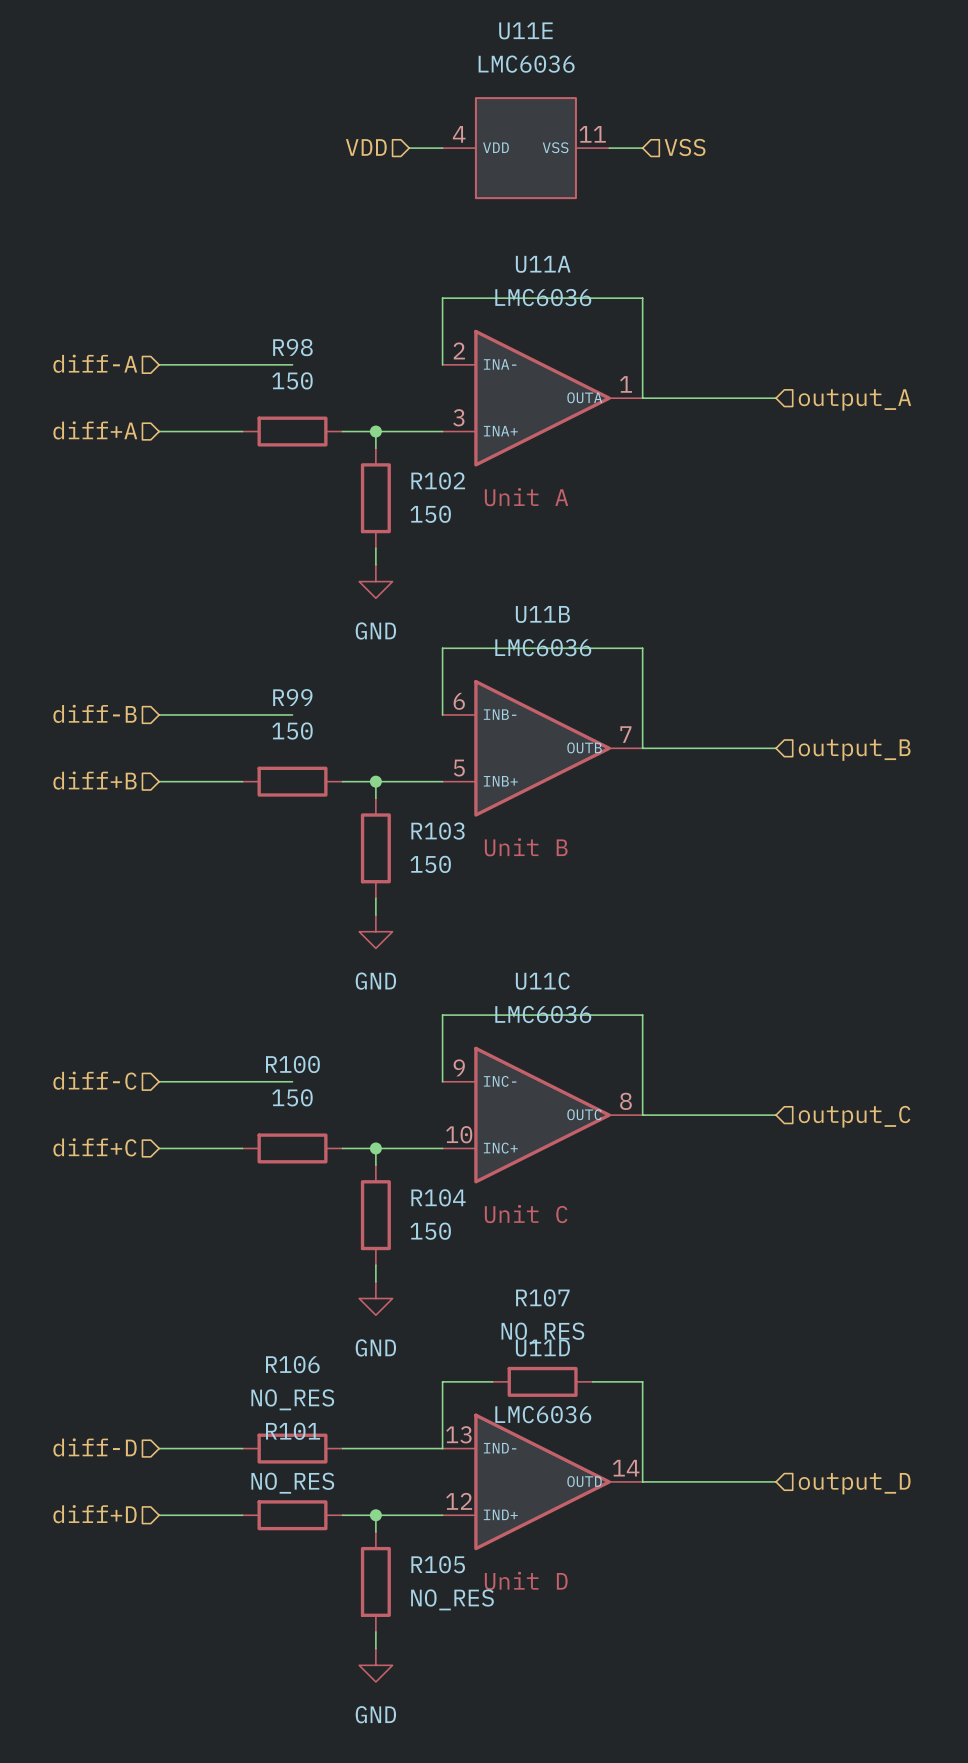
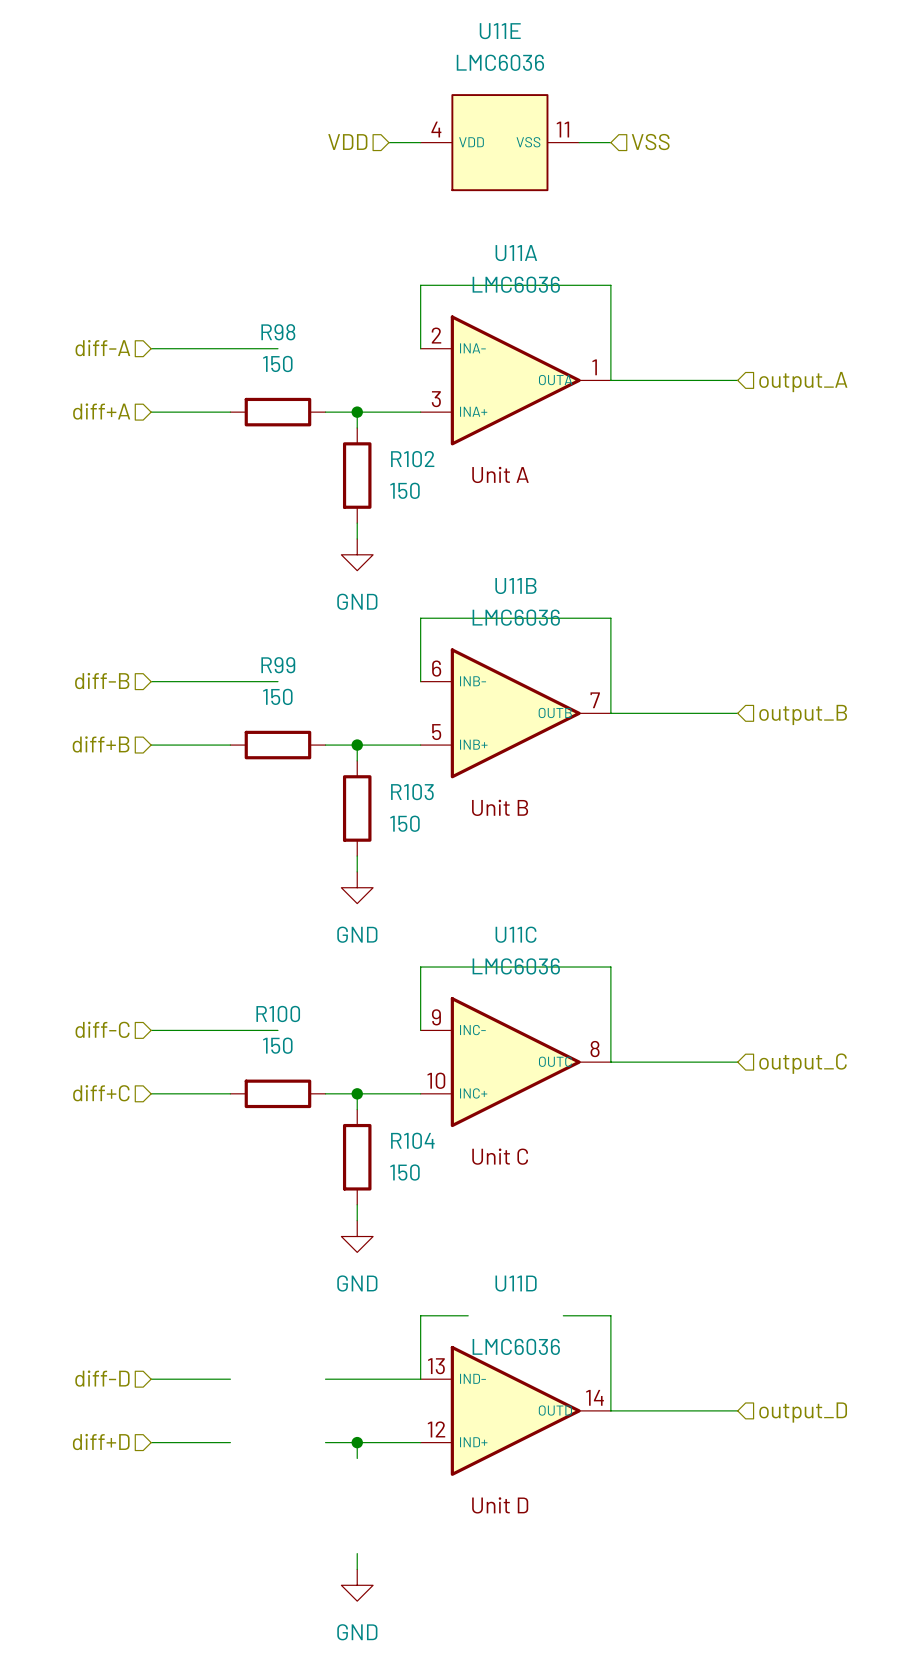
R107: NO_RES (542, 1381) -> none
R106: NO_RES (292, 1448) -> none
R101: NO_RES (292, 1515) -> none
R105: NO_RES (375, 1581) -> none

